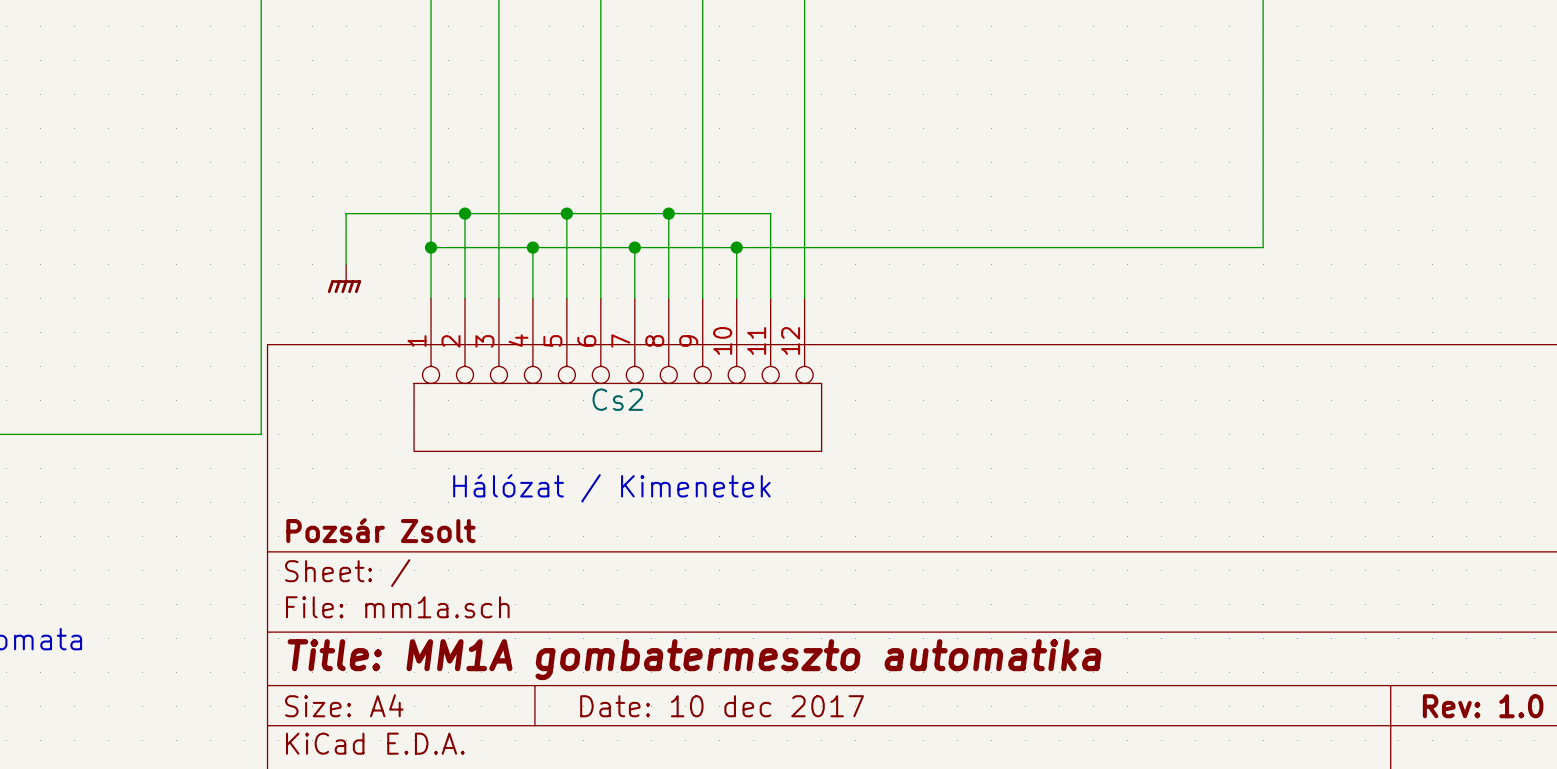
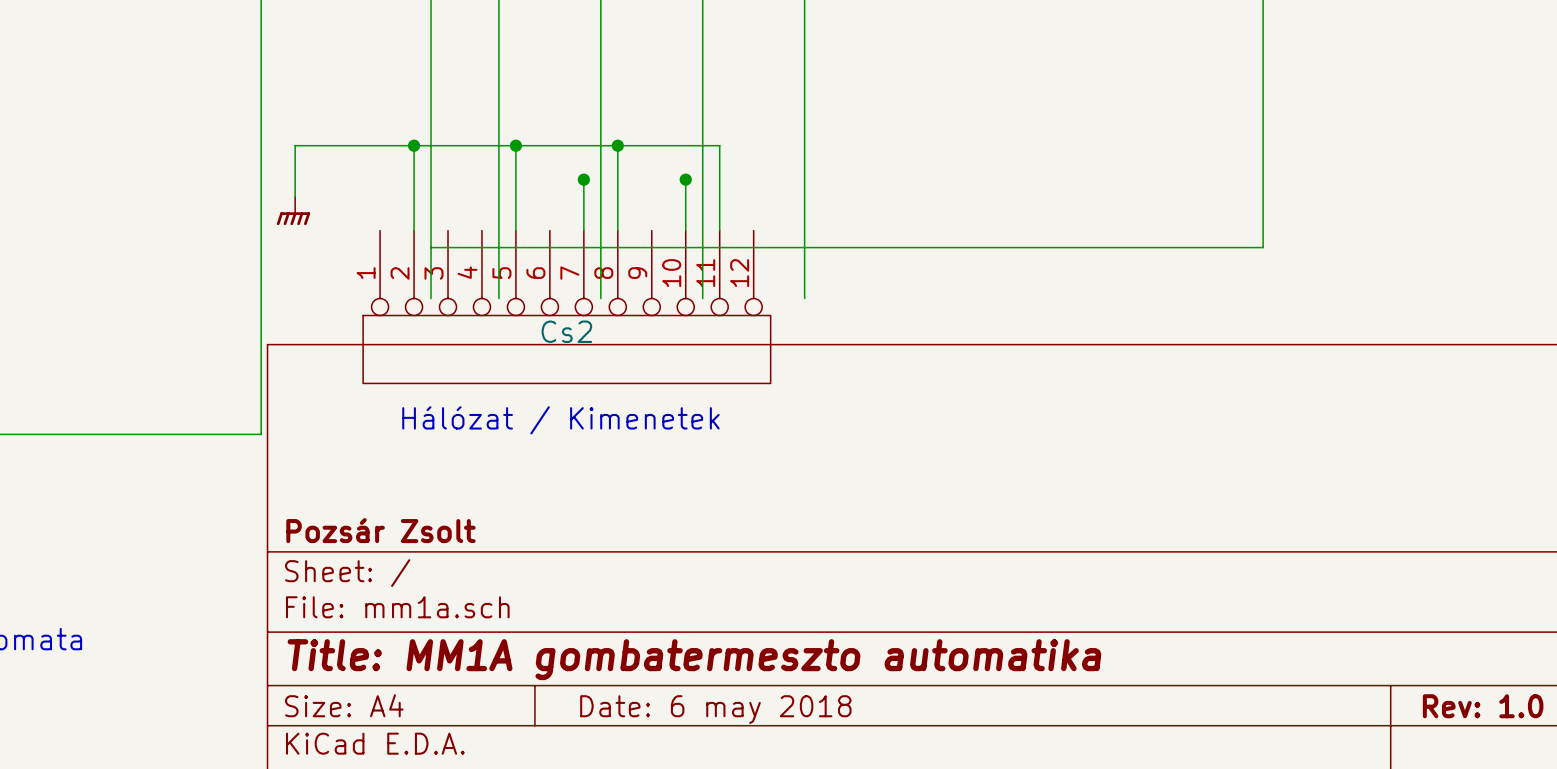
junction: none -> (414, 145)
junction: none -> (515, 145)
junction: none -> (617, 145)
wire: (464, 213) (464, 298) -> (414, 145) (414, 230)
junction: (464, 213) -> none
wire: (566, 213) (566, 298) -> (515, 145) (515, 230)
junction position: (566, 213) -> (583, 179)
wire: (668, 213) (668, 298) -> (617, 145) (617, 230)
junction position: (668, 213) -> (685, 179)
junction: (431, 247) -> none
wire: (532, 247) (532, 298) -> none
junction: (532, 247) -> none
wire: (634, 247) (634, 298) -> (583, 179) (583, 230)
junction: (634, 247) -> none
wire: (736, 247) (736, 298) -> (685, 179) (685, 230)
junction: (736, 247) -> none
wire: (346, 264) (346, 213) (770, 213) (770, 298) -> (295, 196) (295, 145) (719, 145) (719, 230)
power symbol position: (344, 278) -> (293, 210)
Cs2 position: (617, 374) -> (566, 307)
text position: Hálózat / Kimenetek (611, 488) -> Hálózat / Kimenetek (560, 420)
title block: Date: 10 dec 2017 (722, 706) -> Date: 6 may 2018 (715, 709)

